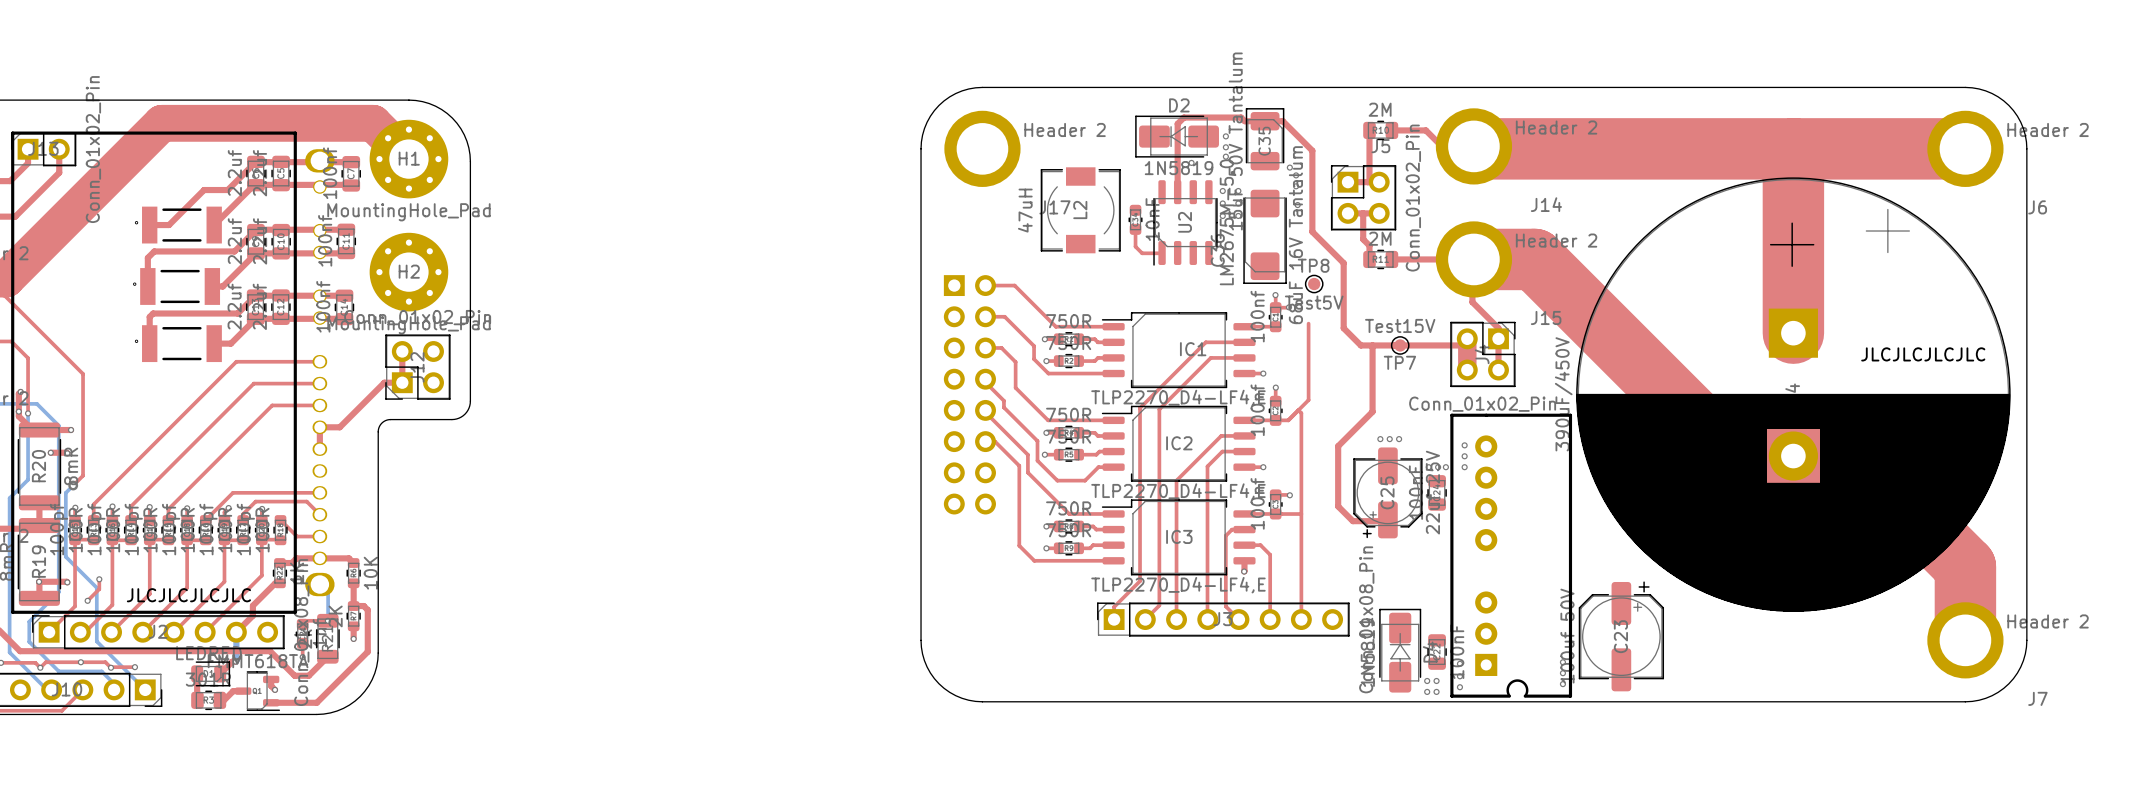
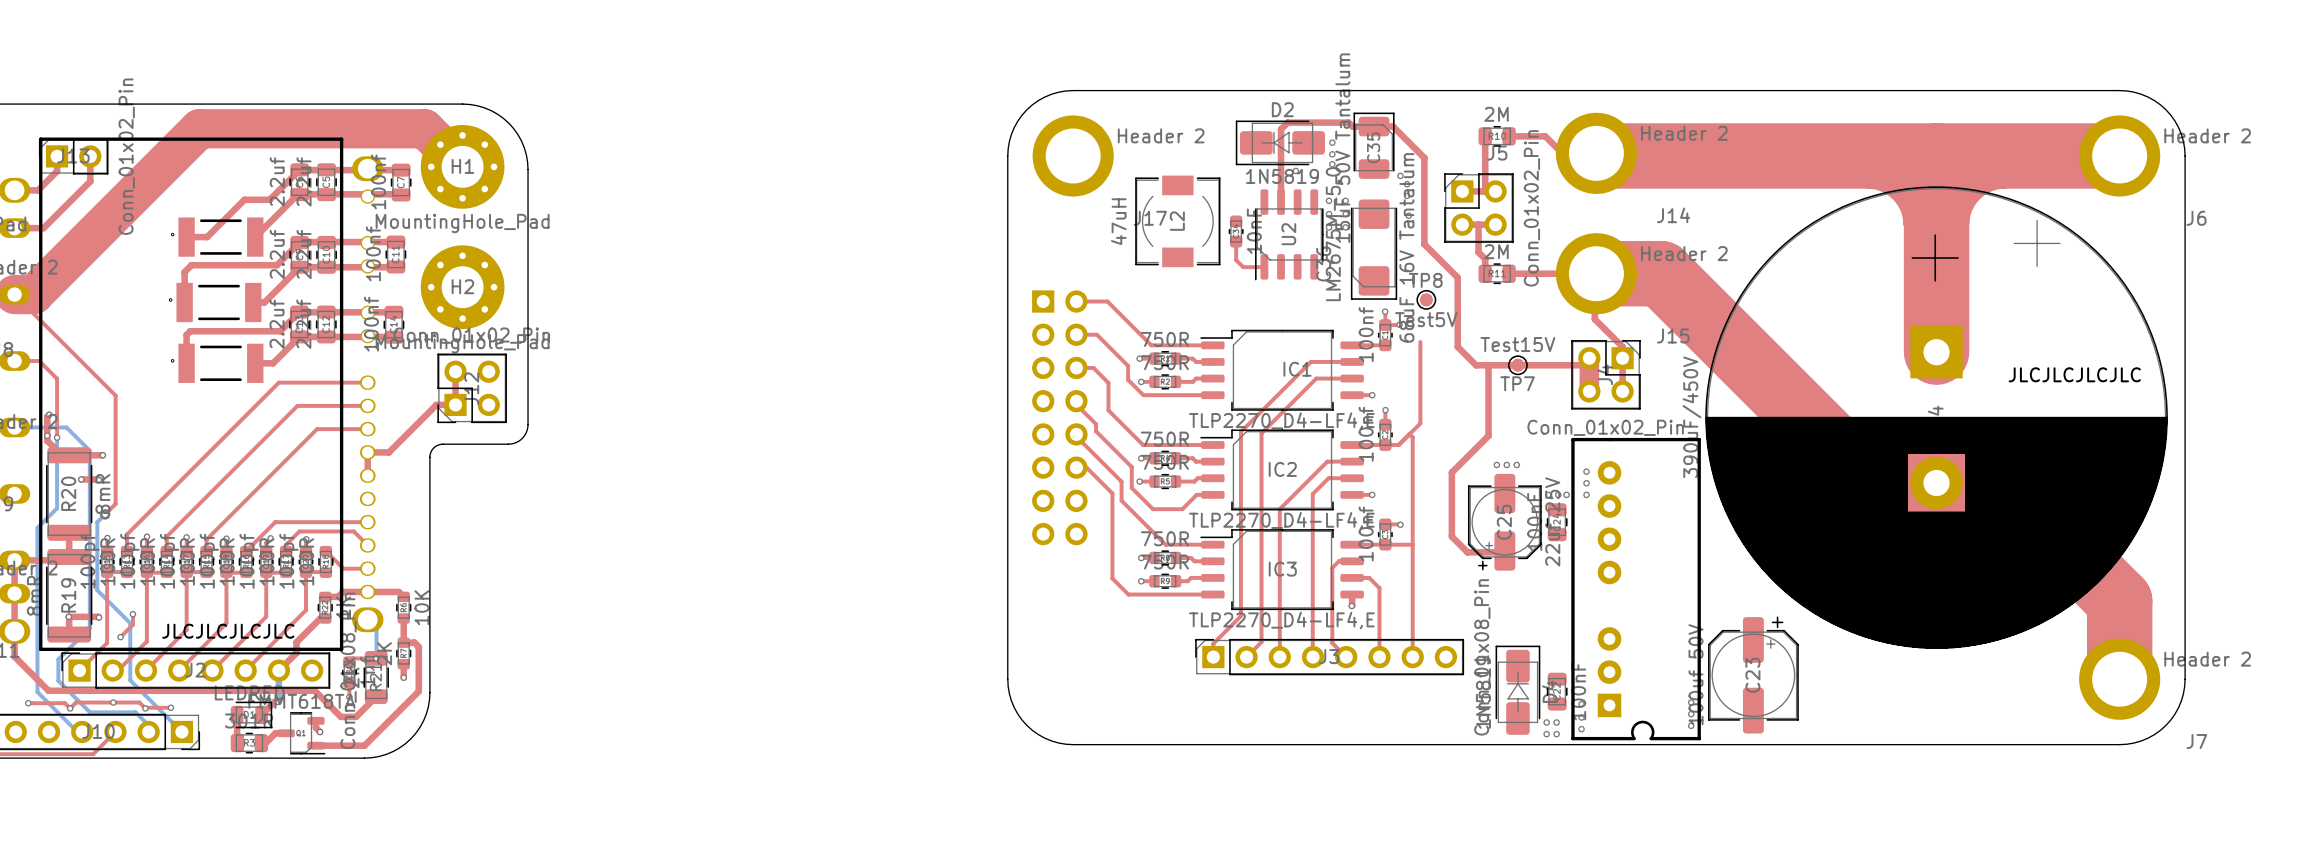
drawing: none -> [1865, 185, 1907, 227]
drawing: none -> [1966, 185, 2008, 227]

